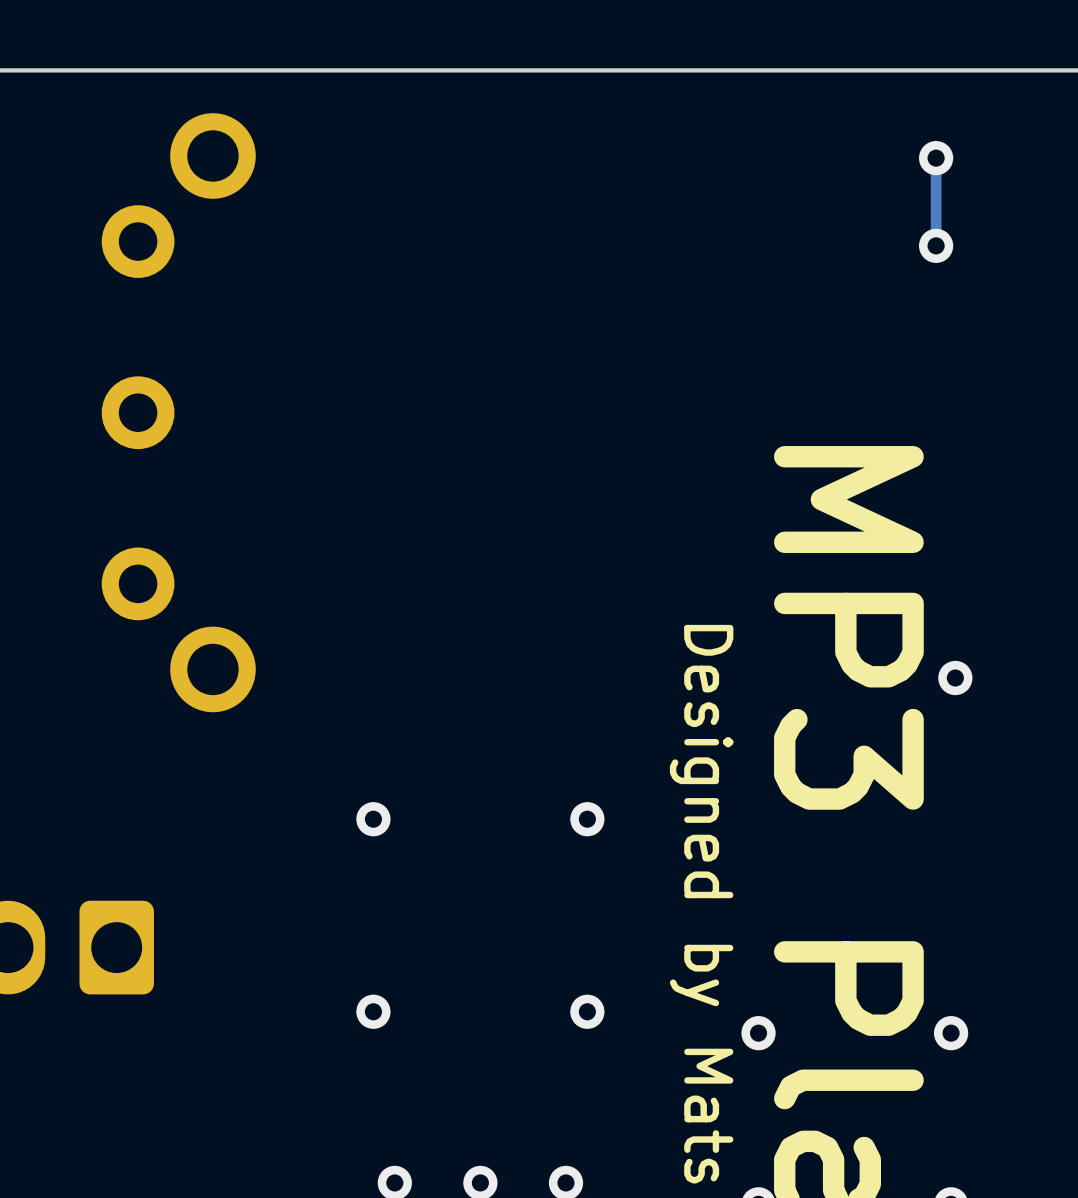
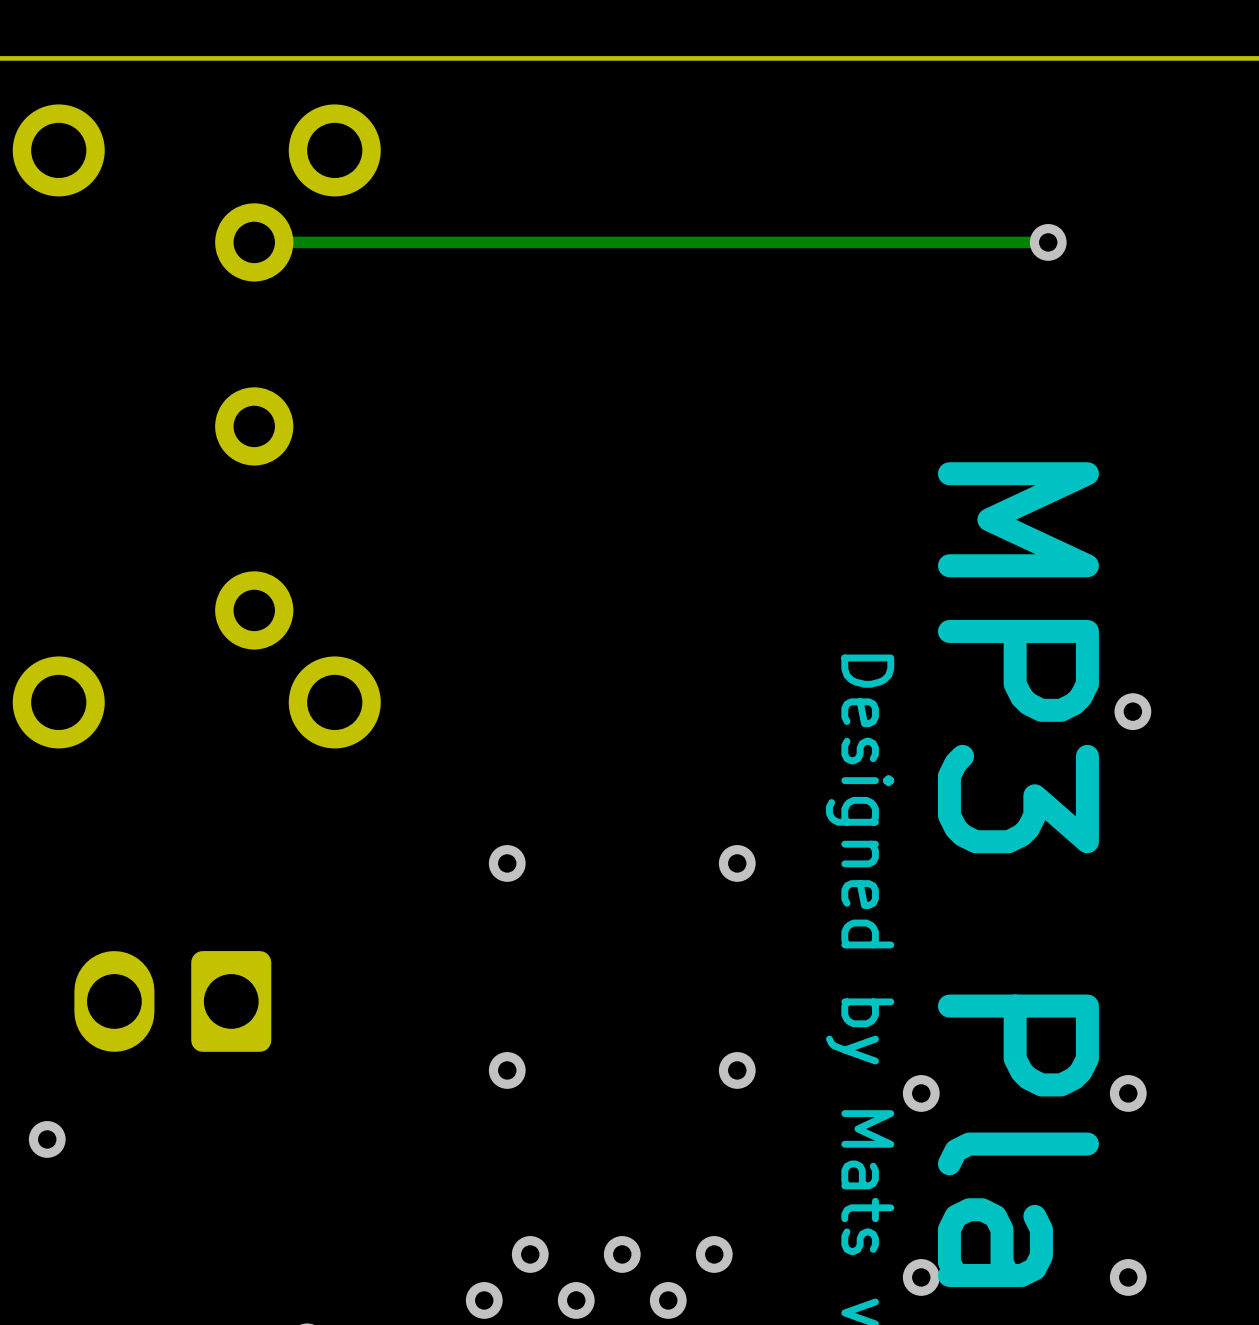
track: (936, 158) (936, 245) -> none
via: (936, 158) -> none
via: none -> (1048, 242)
track: none -> (1050, 242) (254, 242)
via: (936, 245) -> none

